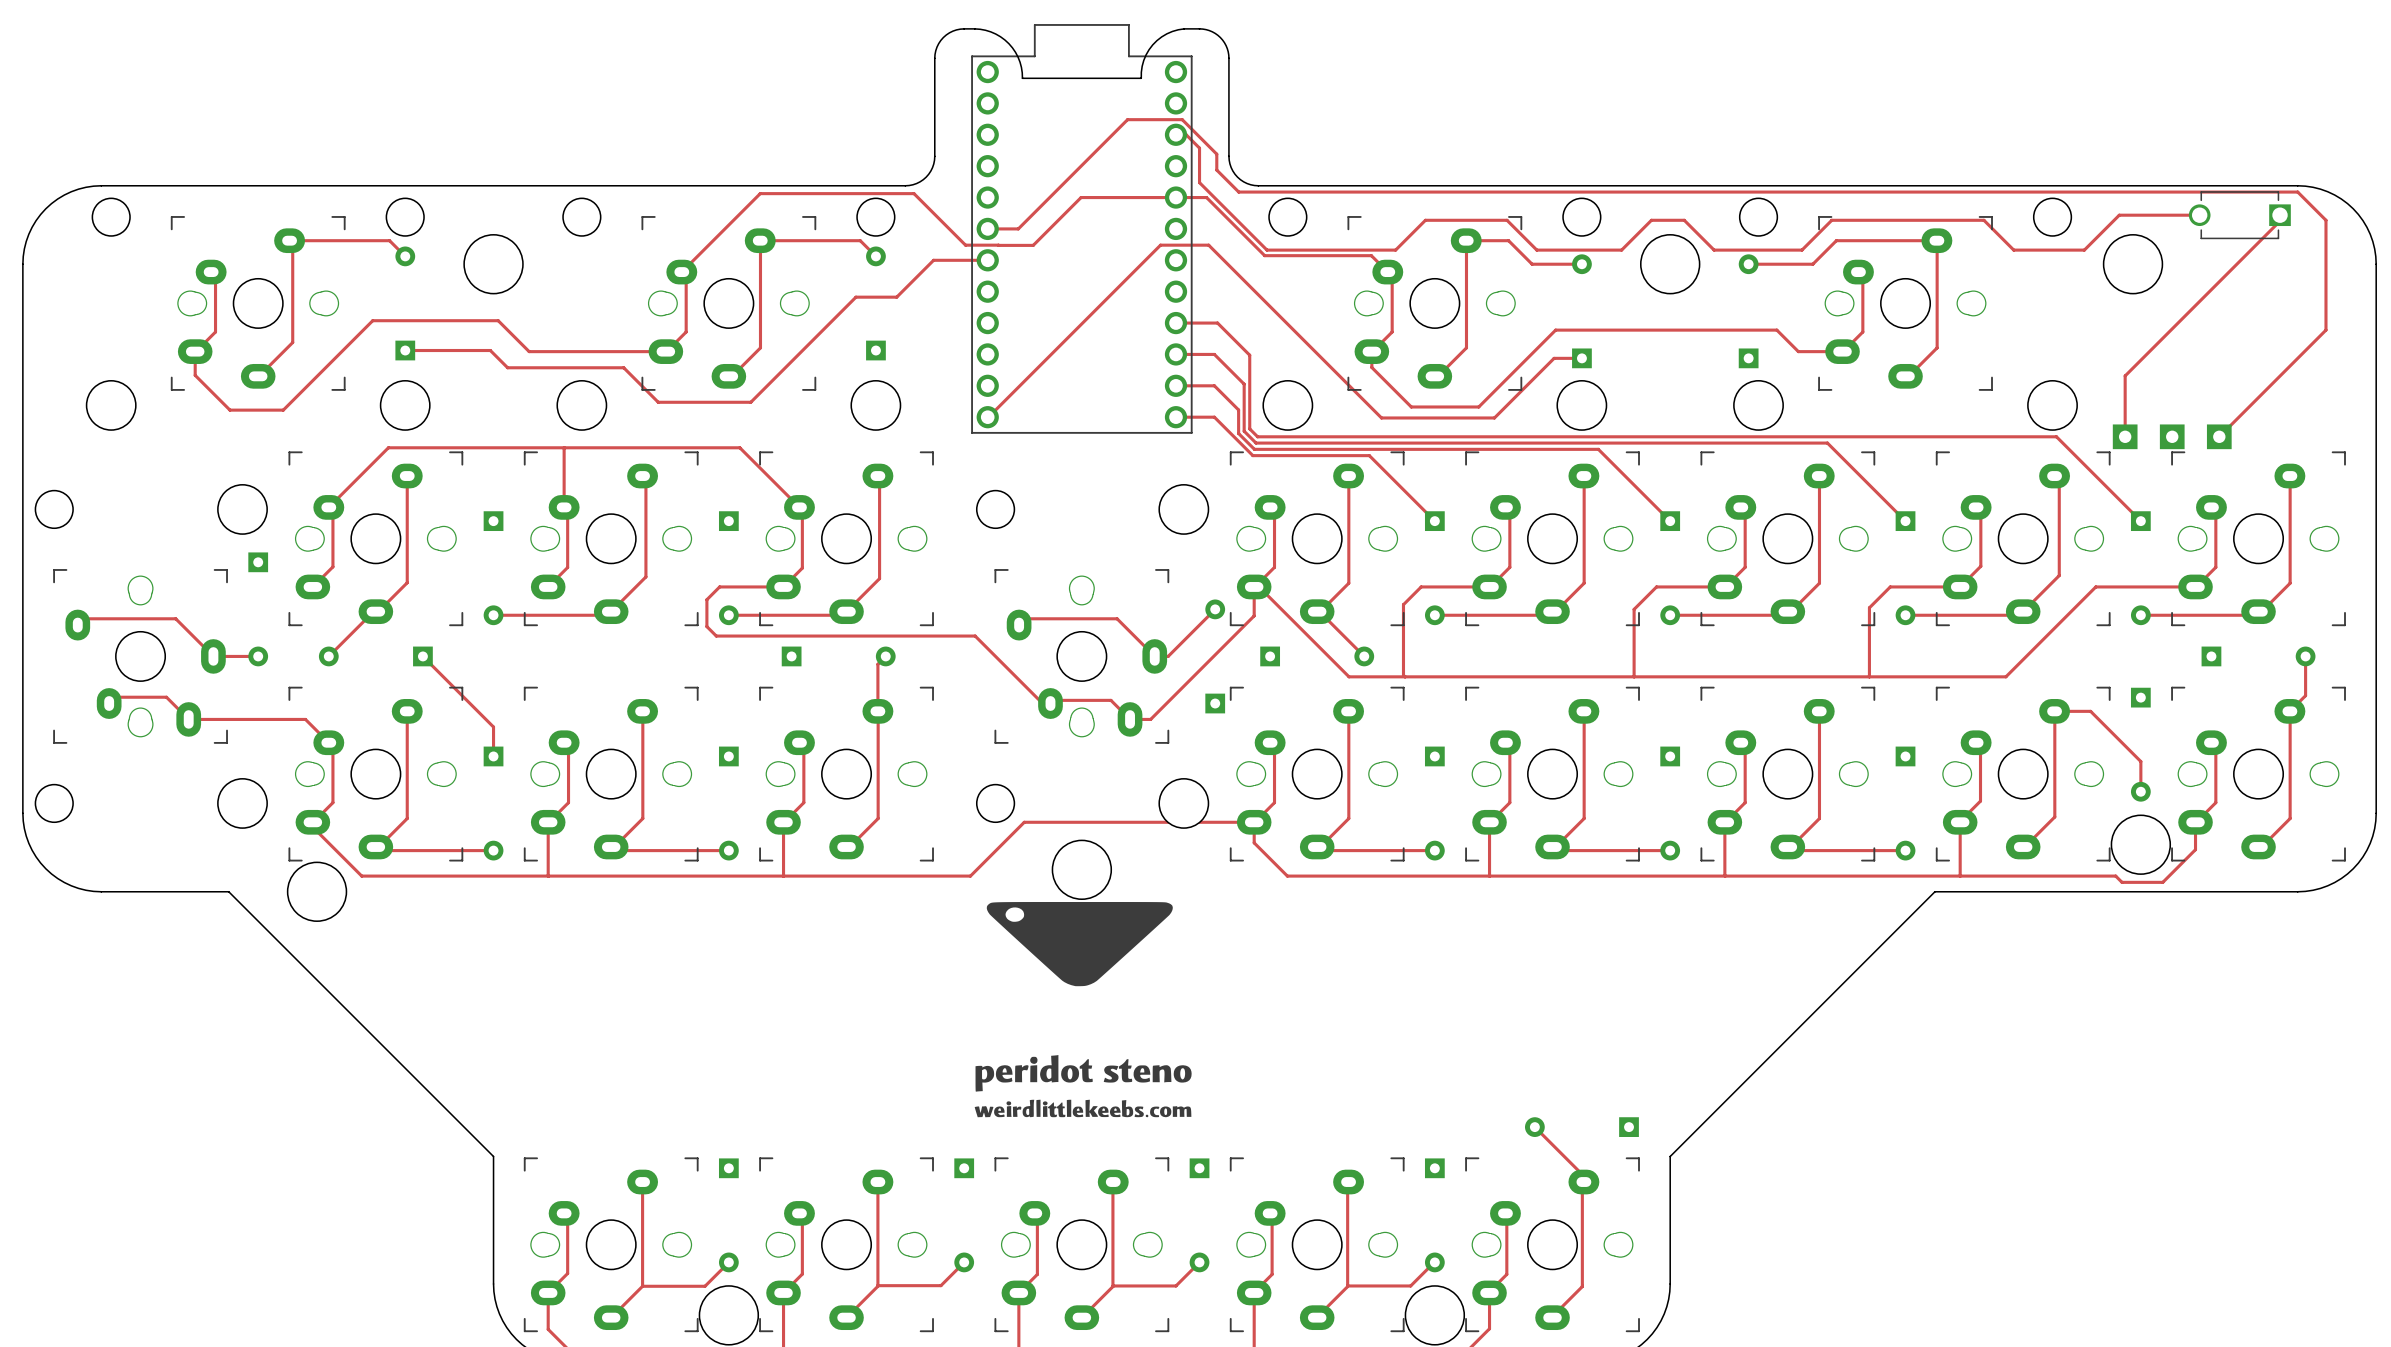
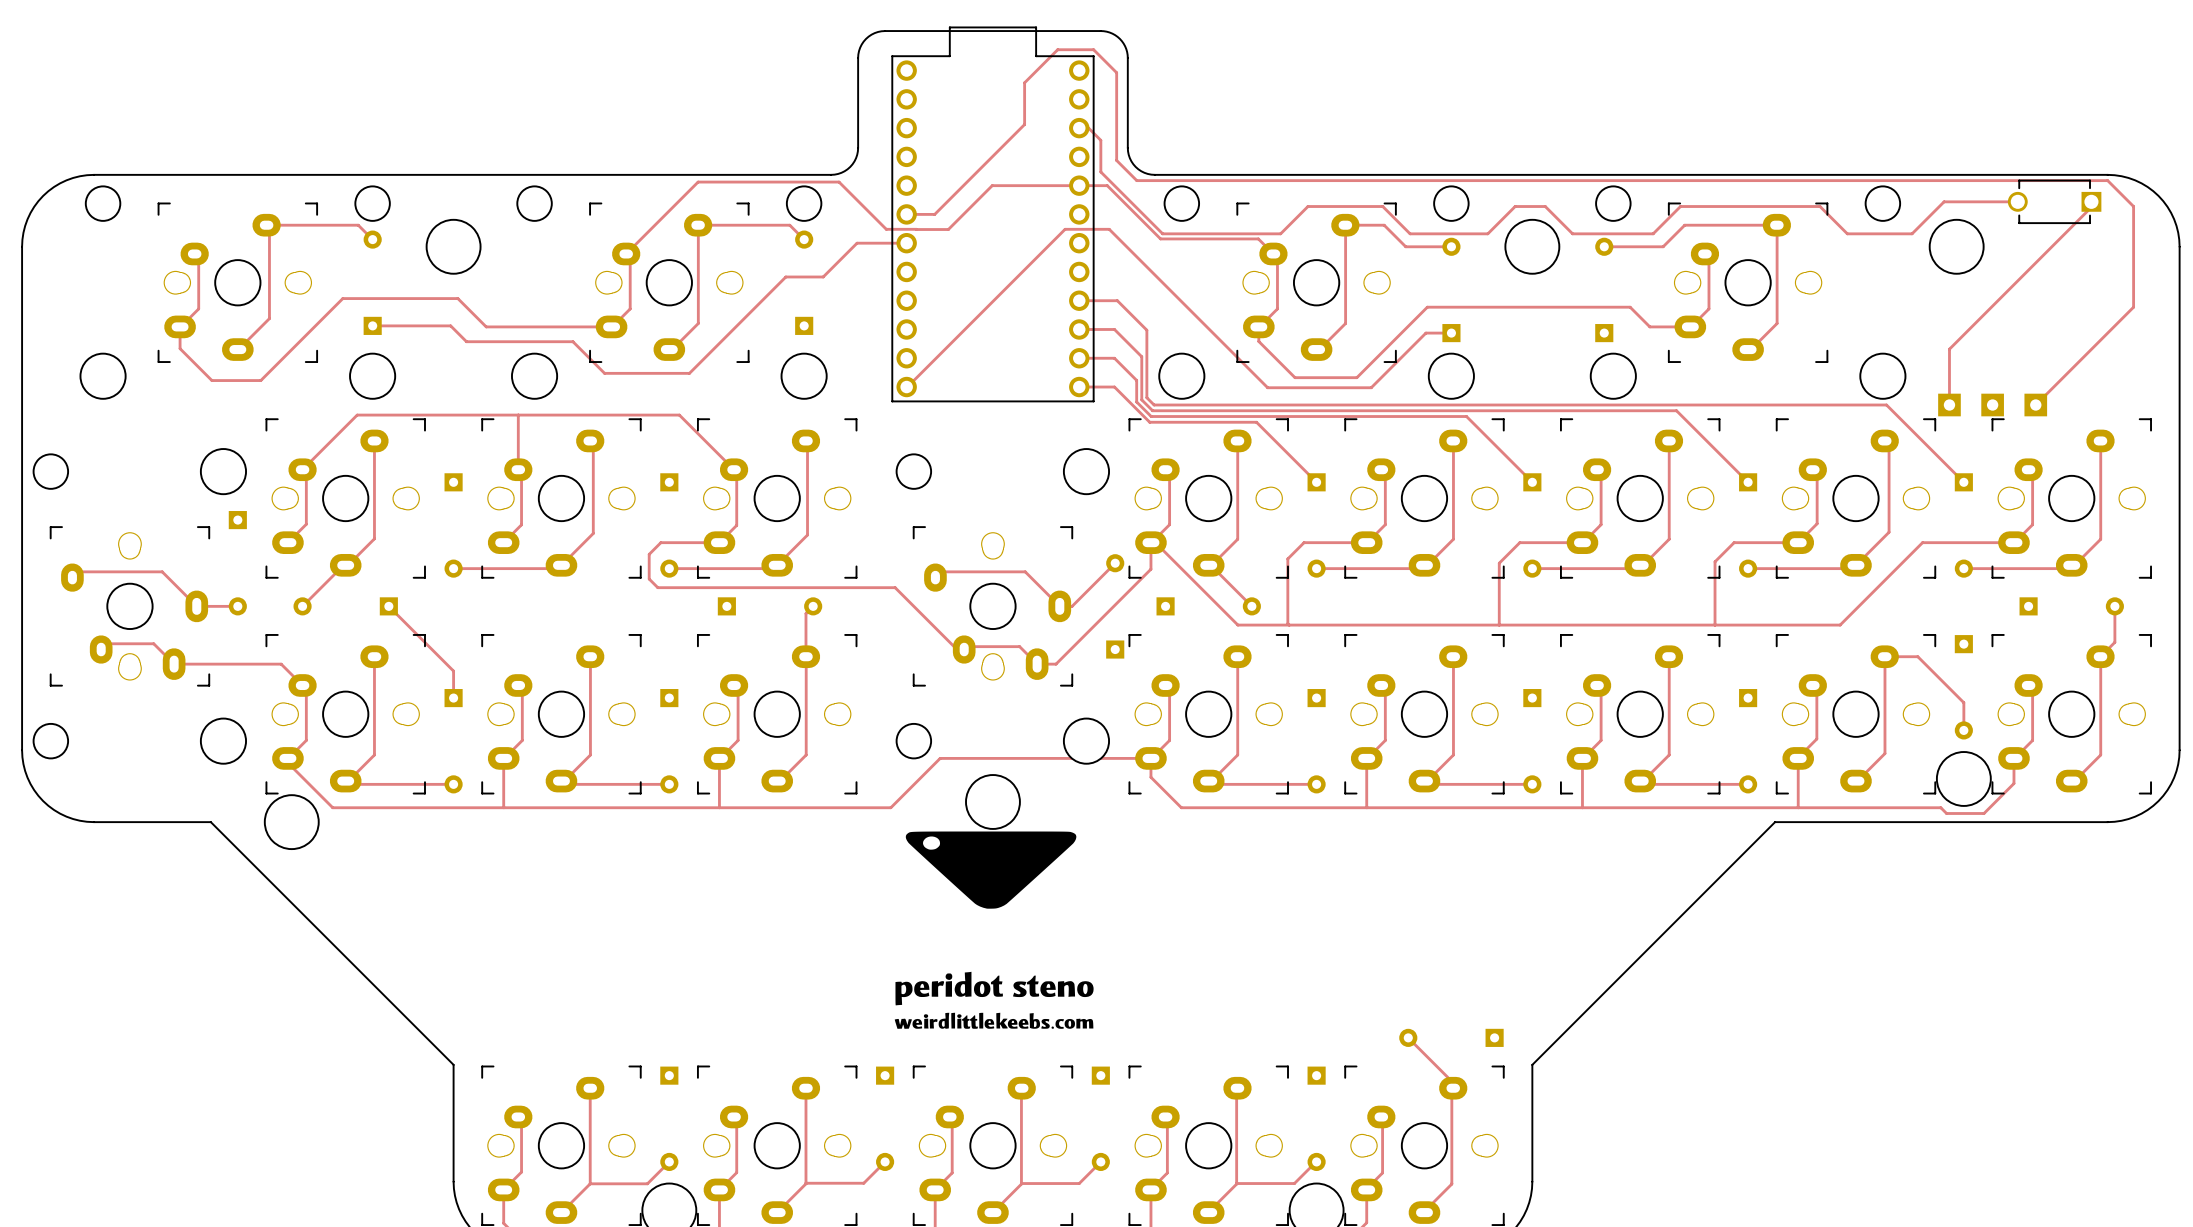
board edge: (974, 28) (990, 31) (1008, 43) (1018, 57) (1022, 78) (1141, 78) (1143, 60) (1152, 44) (1166, 33) (1184, 28) -> (894, 31) (1086, 31)
track: (1116, 130) (1127, 119) (1182, 119) (1216, 154) -> (1024, 124) (1024, 82) (1057, 49) (1093, 49) (1116, 72) (1116, 145)

